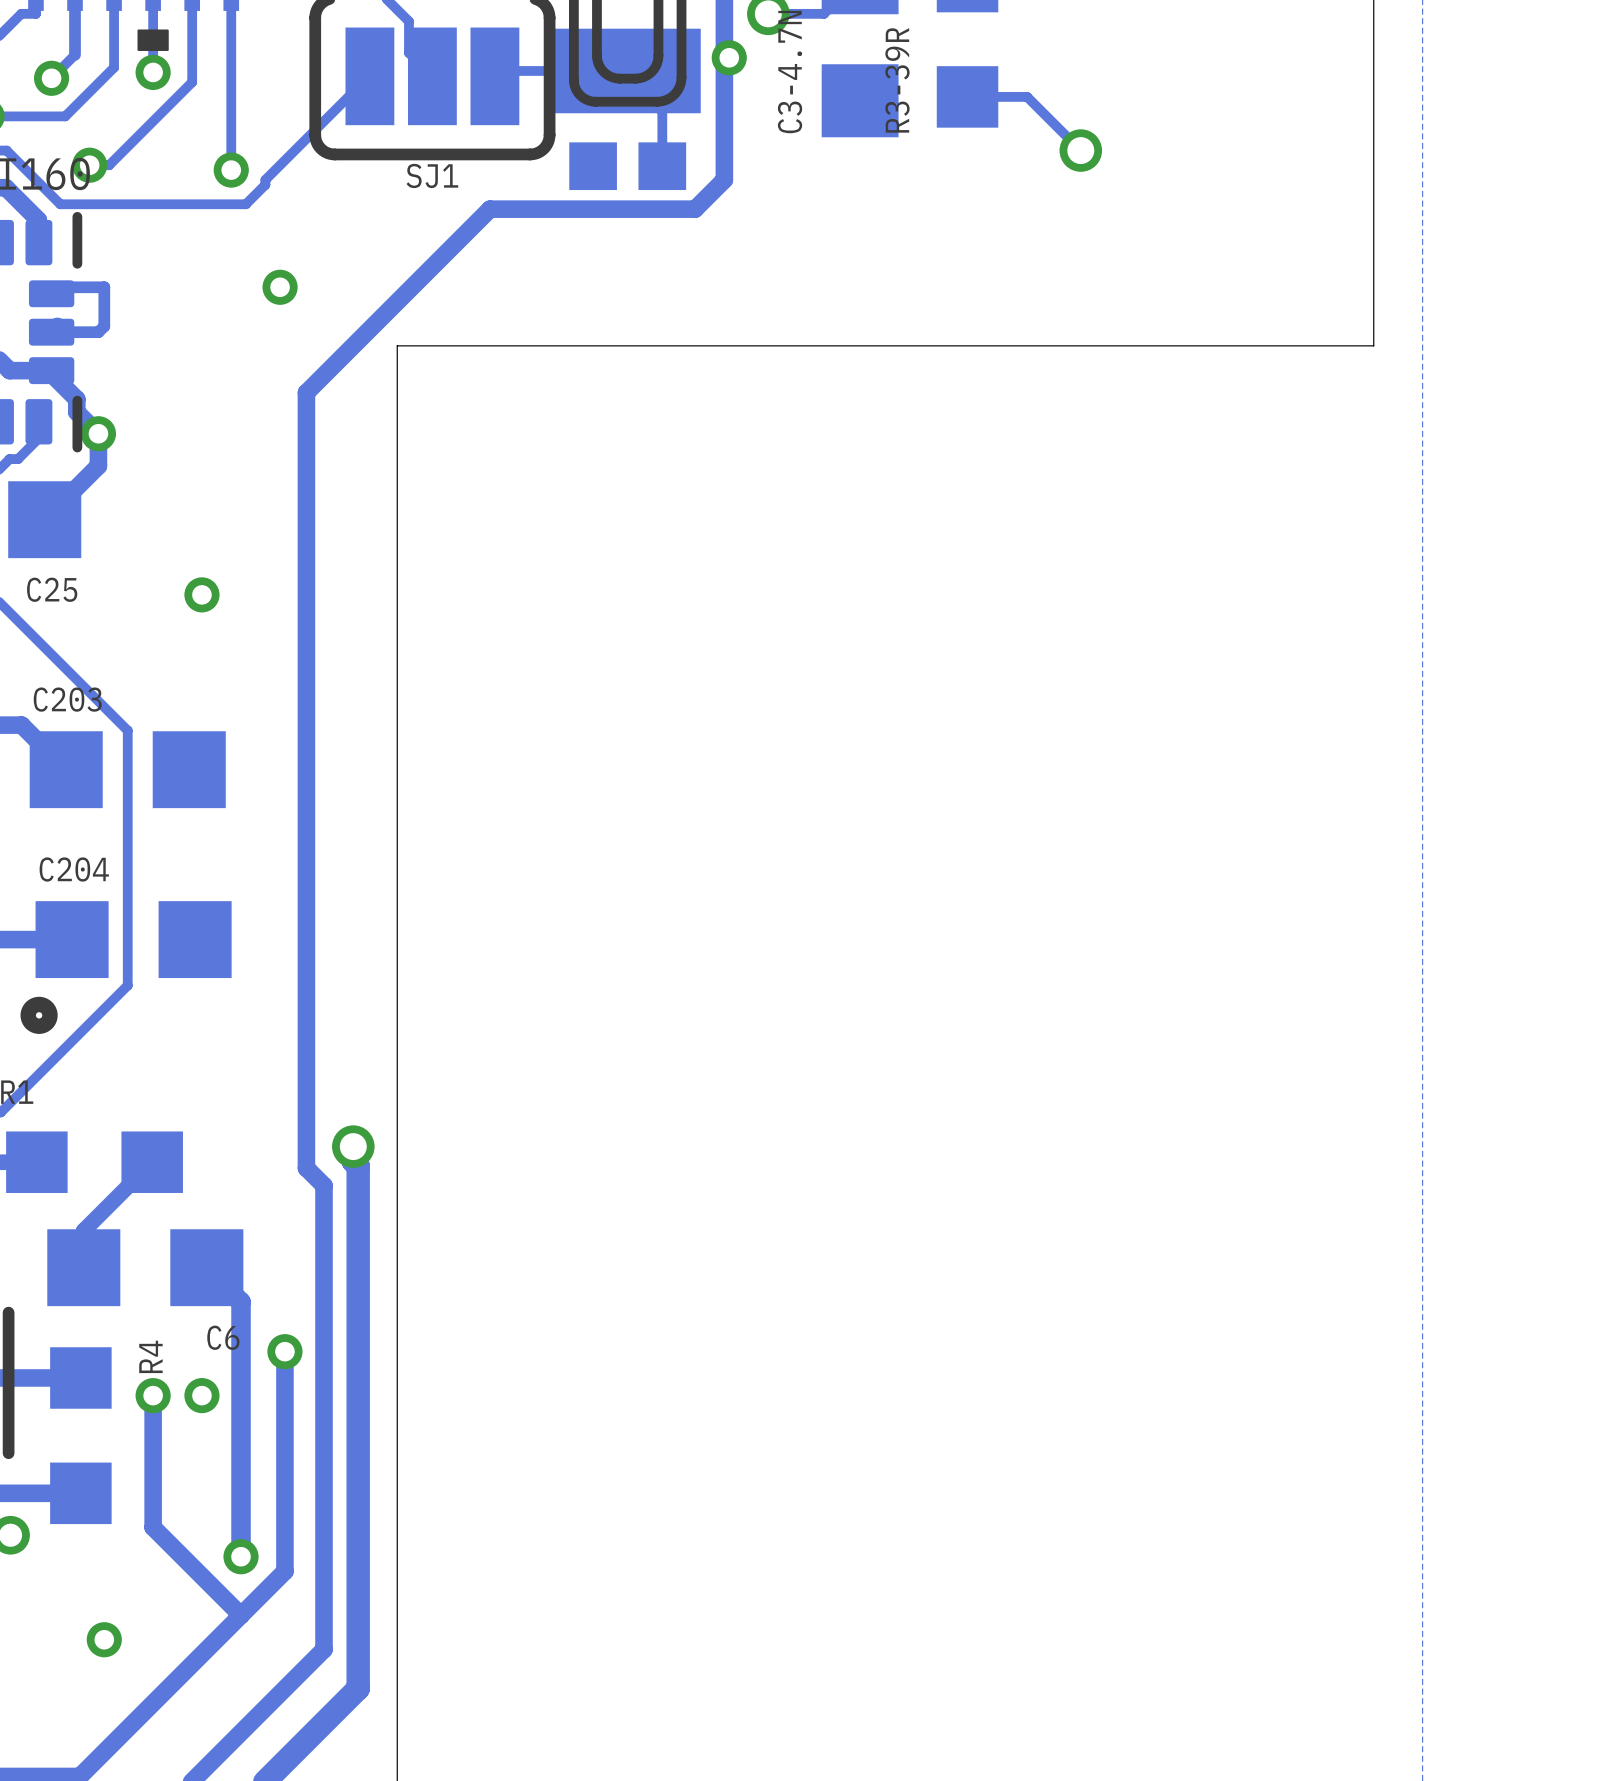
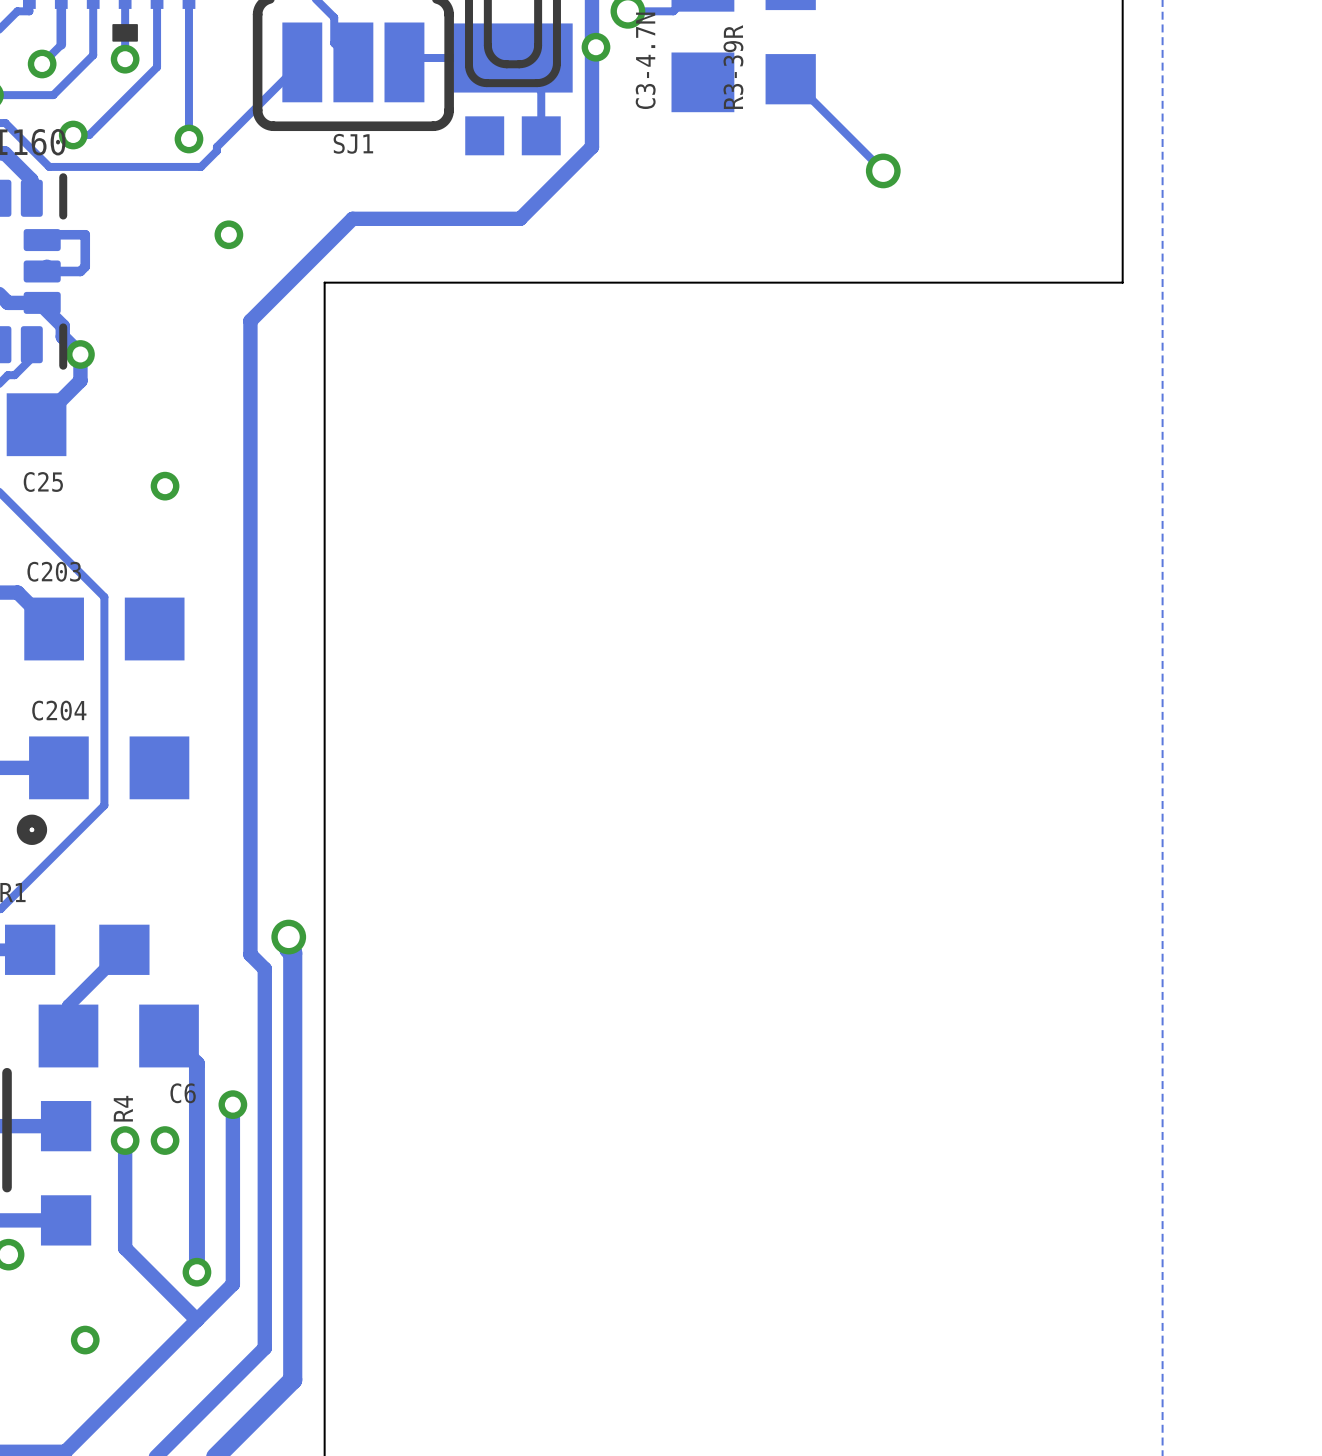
track: (968, 96) (1027, 96) (1080, 150) -> (791, 79) (883, 170)
via position: (1080, 150) -> (883, 170)
track: (695, 209) (490, 209) (431, 267) -> (568, 170) (520, 218) (352, 218)

